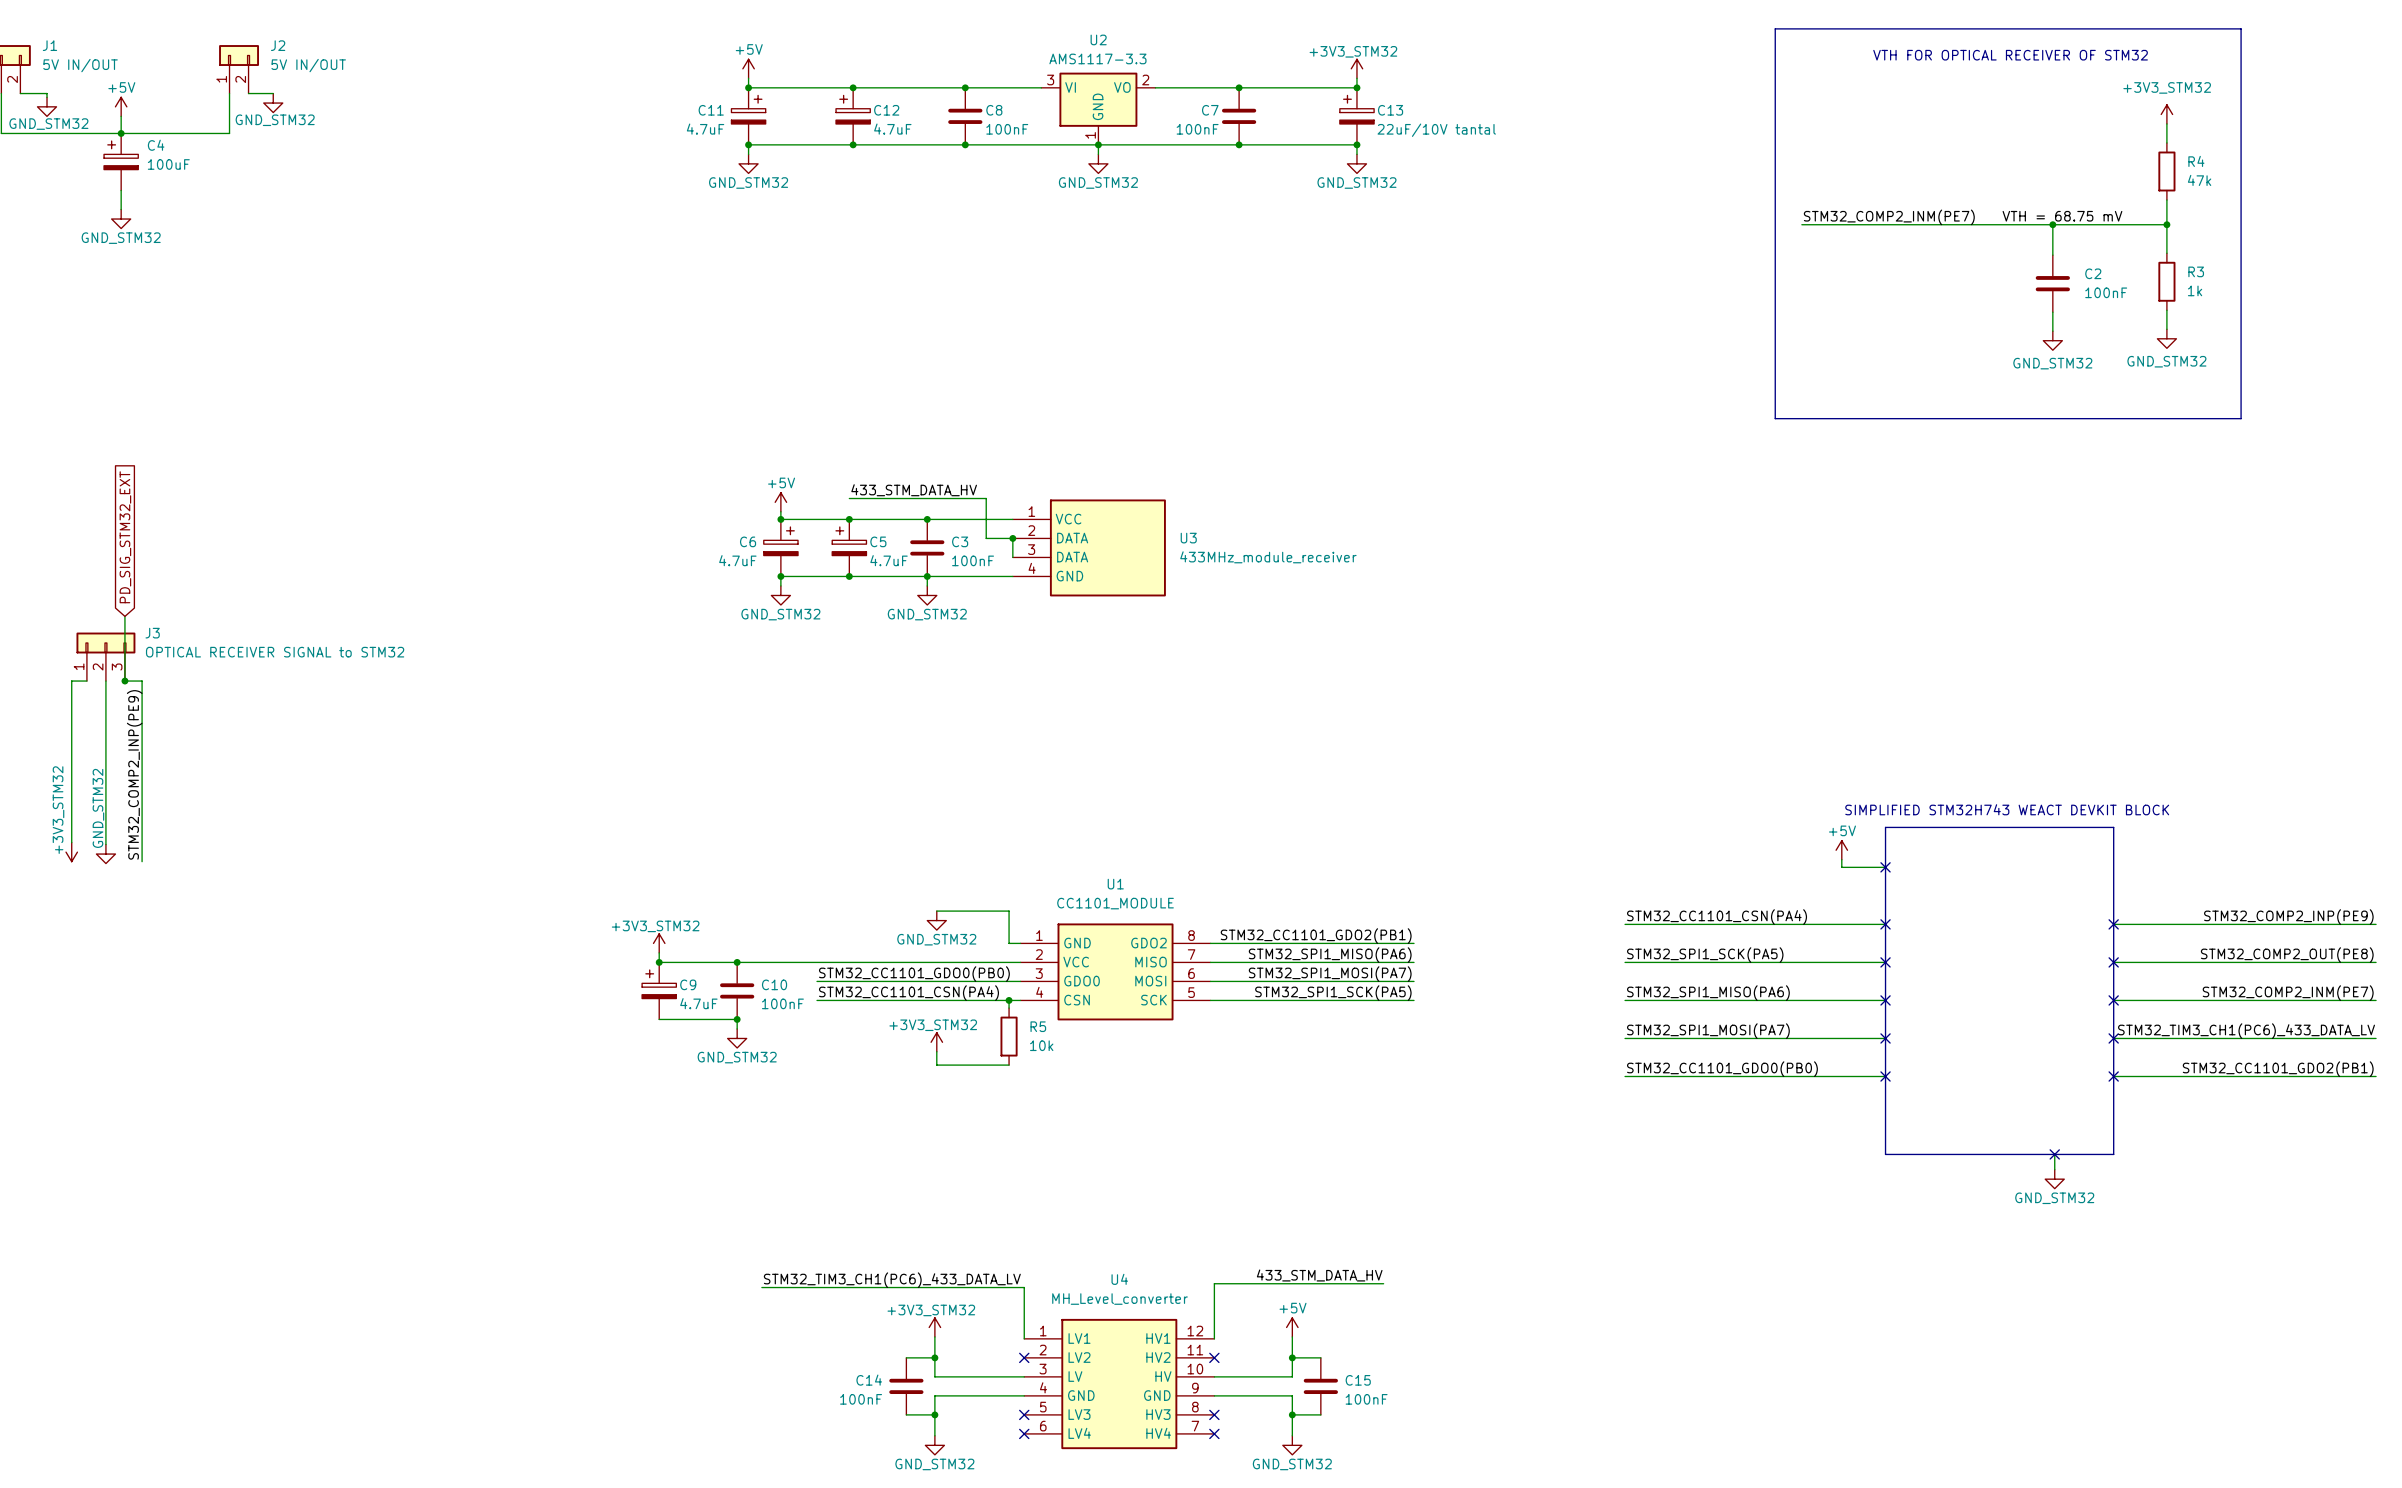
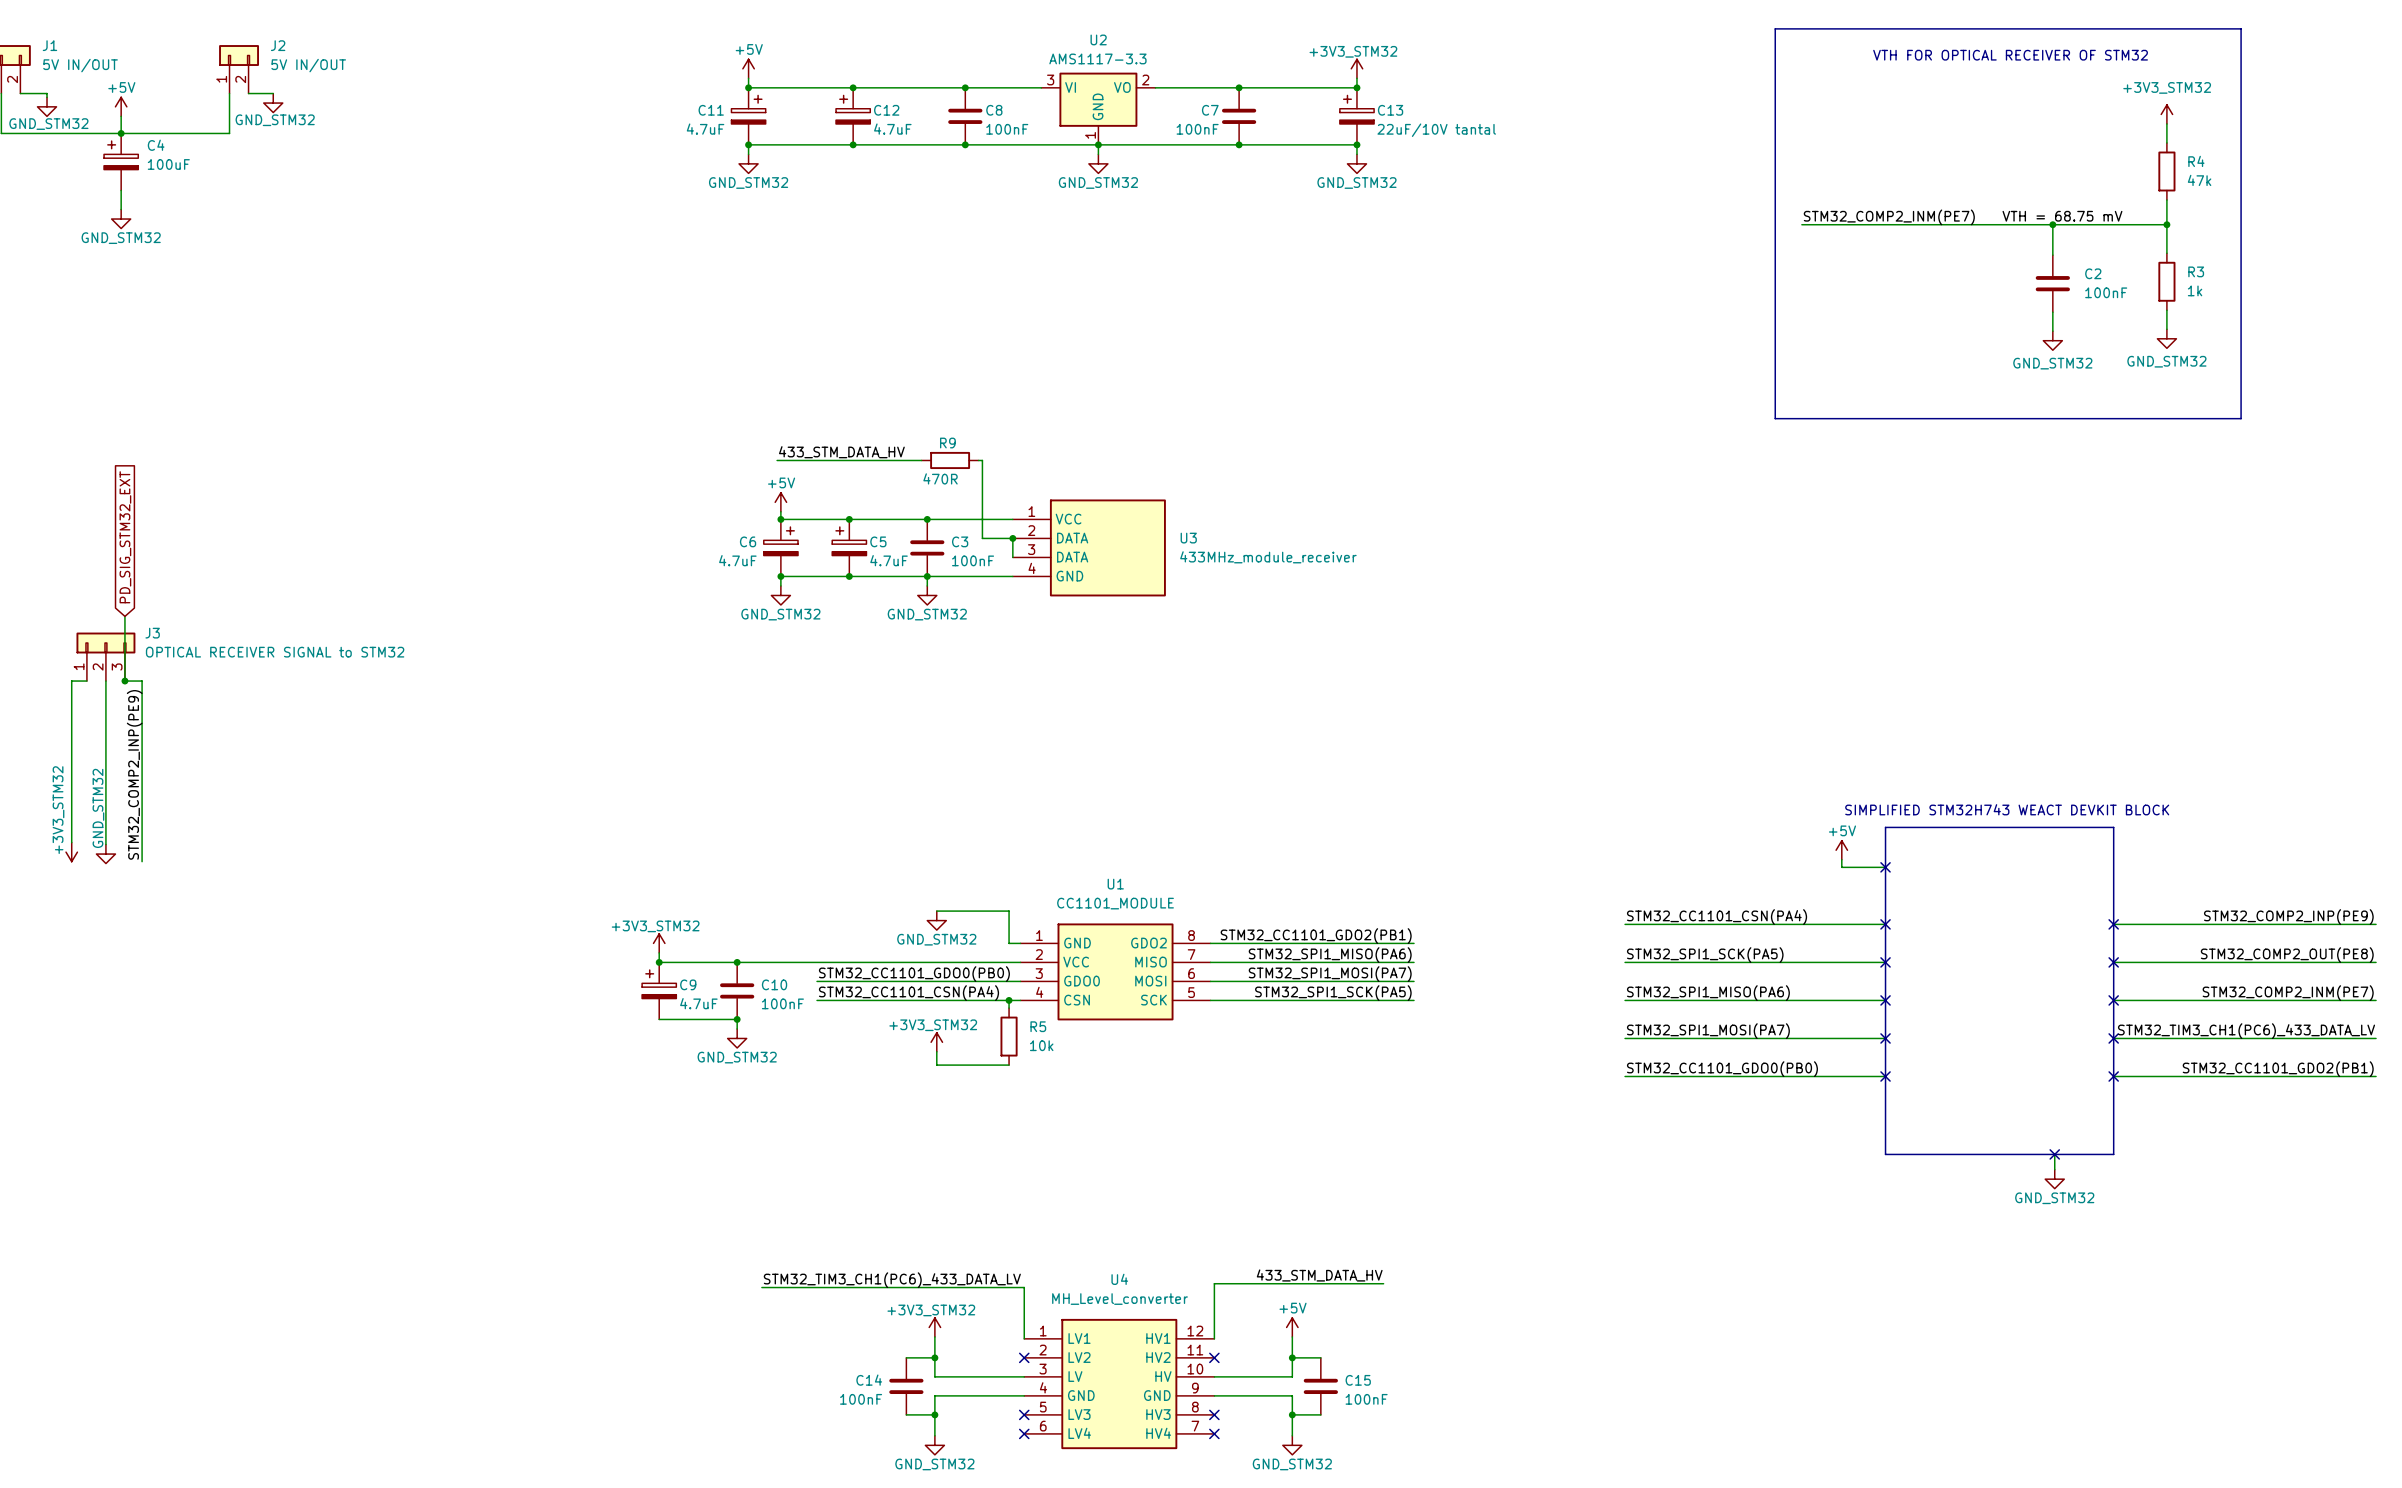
wire: none -> (777, 460) (921, 460)
R9: none -> 470R (950, 460)
label position: 433_STM_DATA_HV (914, 490) -> 433_STM_DATA_HV (841, 452)
wire: (849, 498) (986, 498) (986, 538) -> (978, 460) (982, 460) (982, 538) (986, 538)

